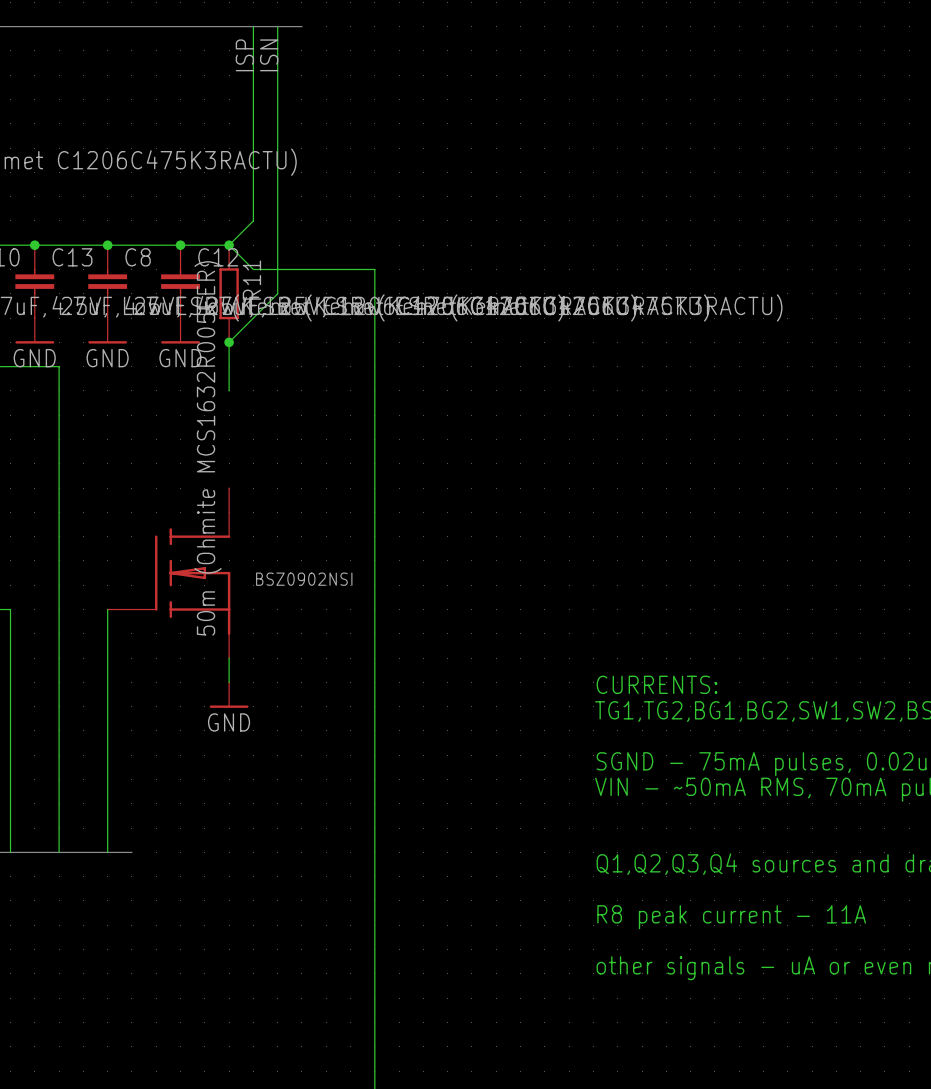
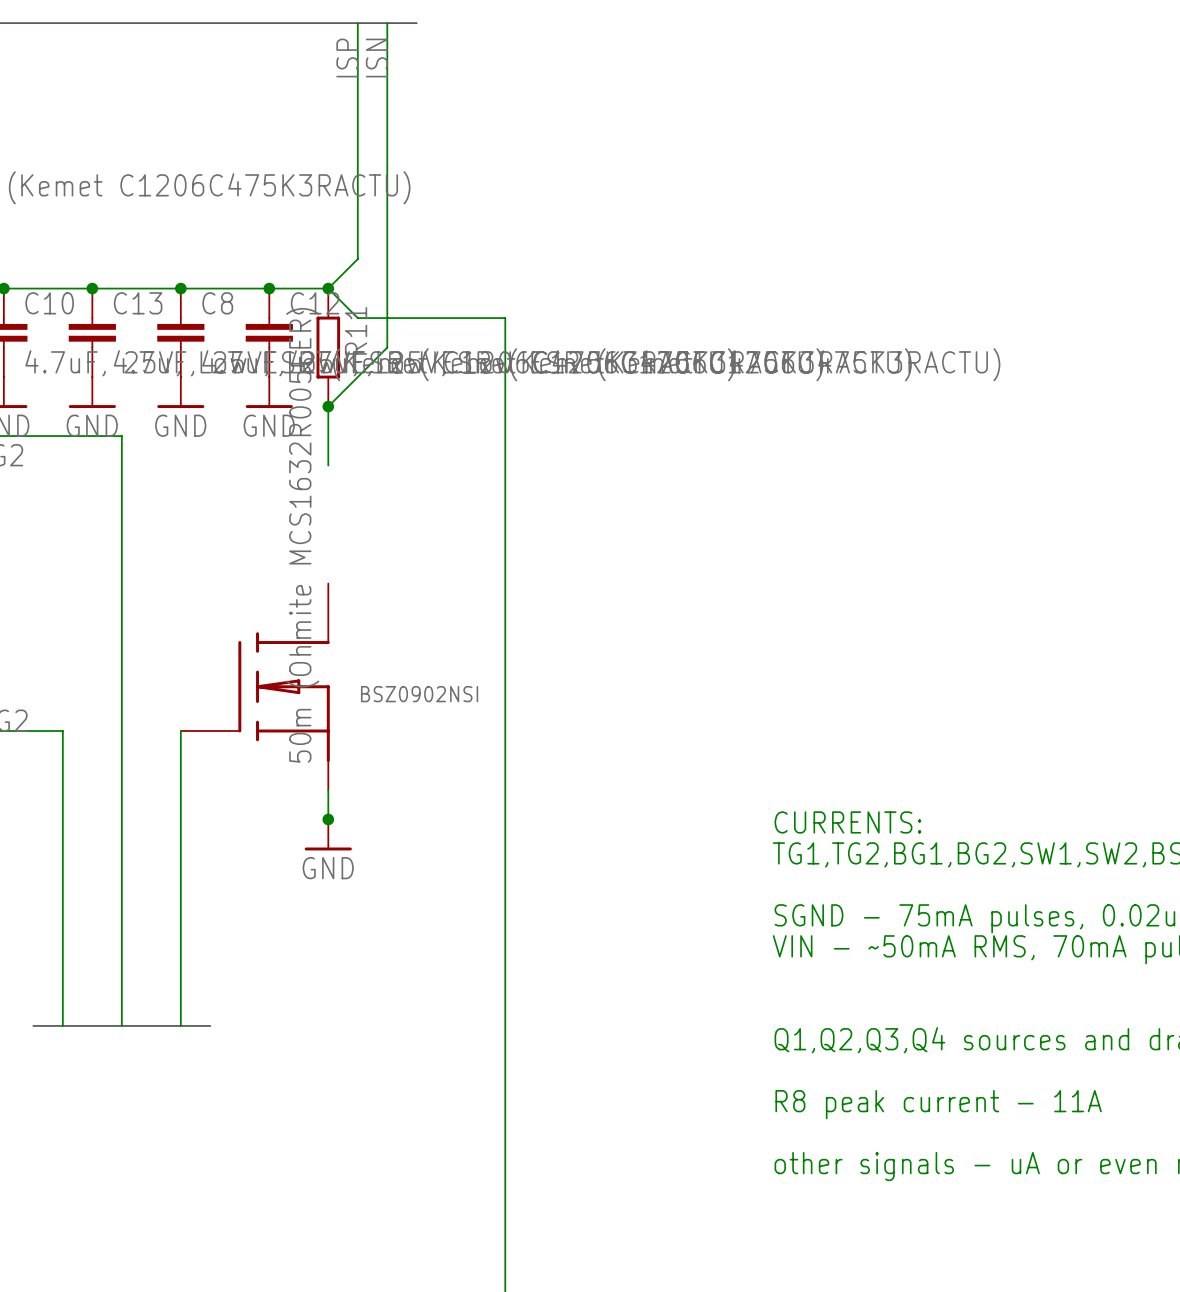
junction: none -> (328, 819)

